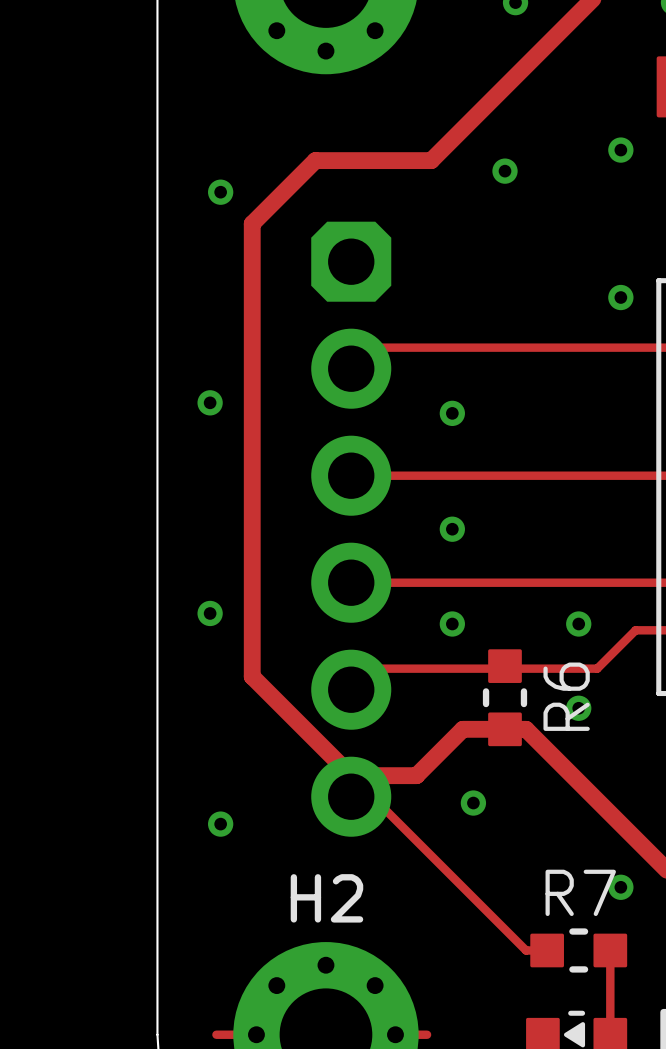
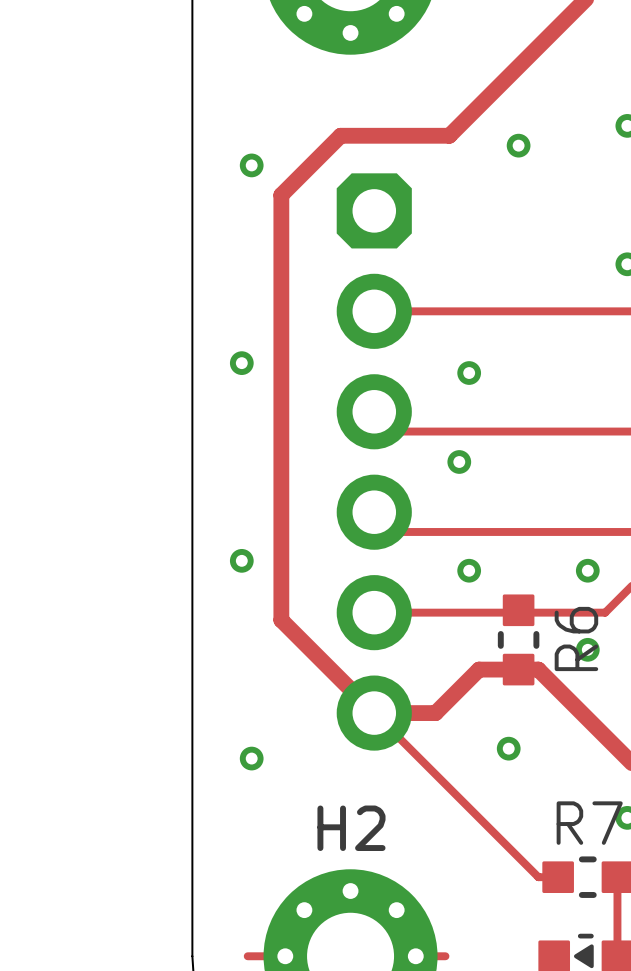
part position: (351, 529) -> (374, 461)
via position: (452, 529) -> (459, 461)
via position: (473, 803) -> (508, 748)

